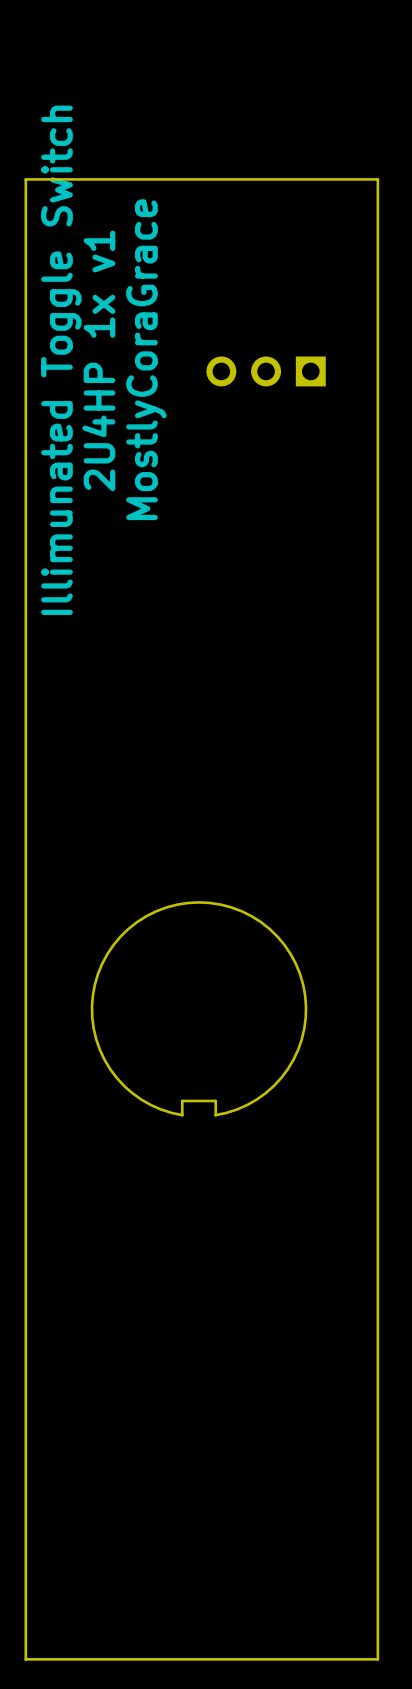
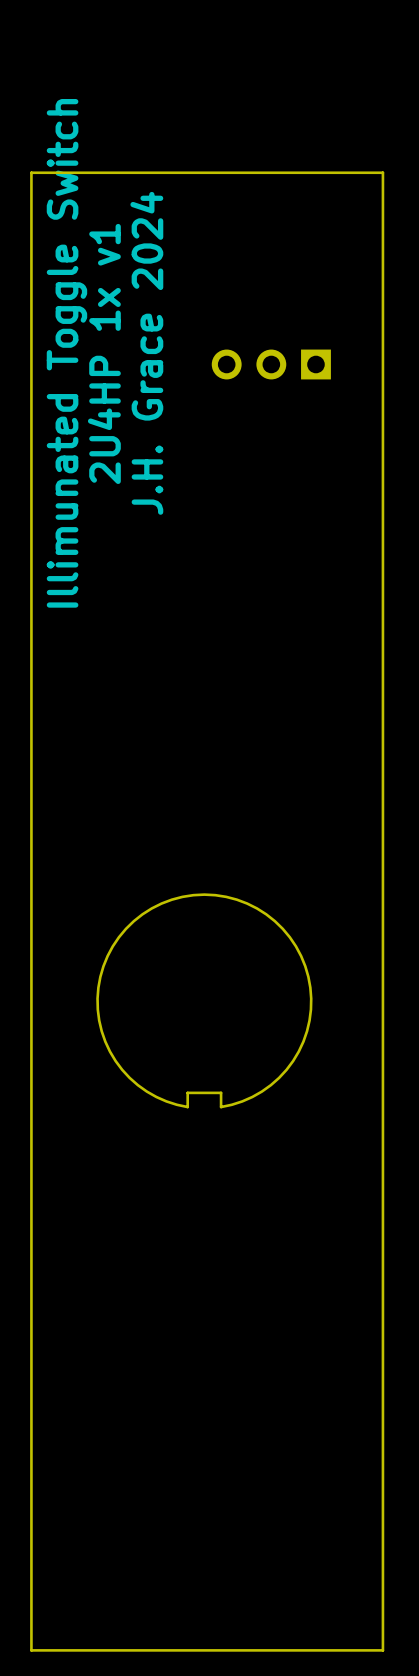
text: MostlyCoraGrace (146, 359) -> J.H. Grace 2024 (146, 353)

